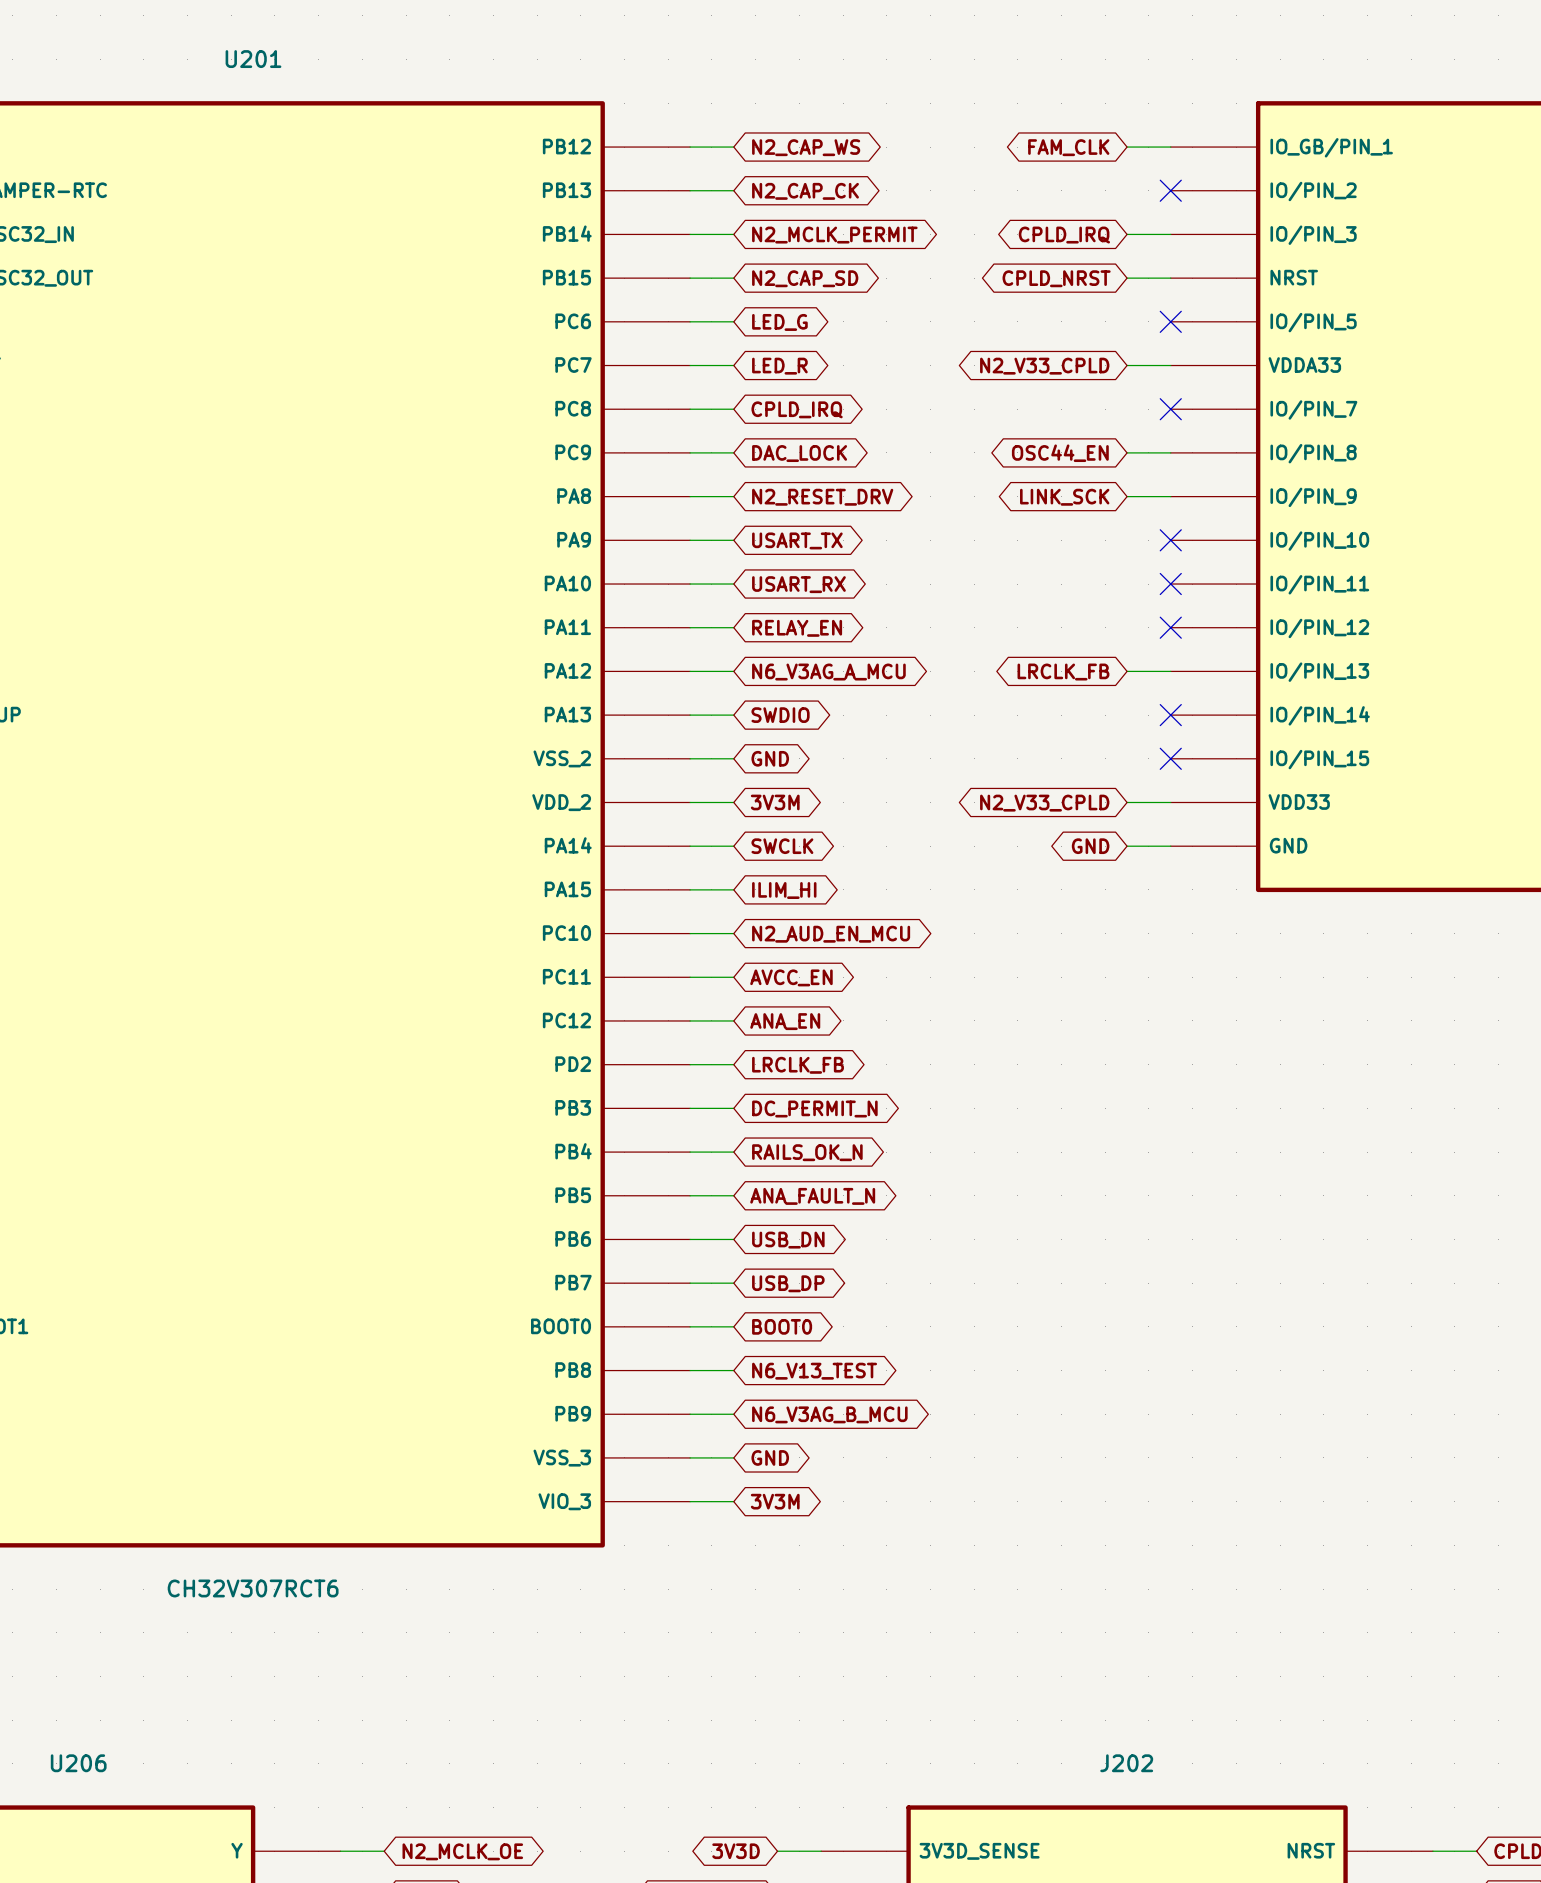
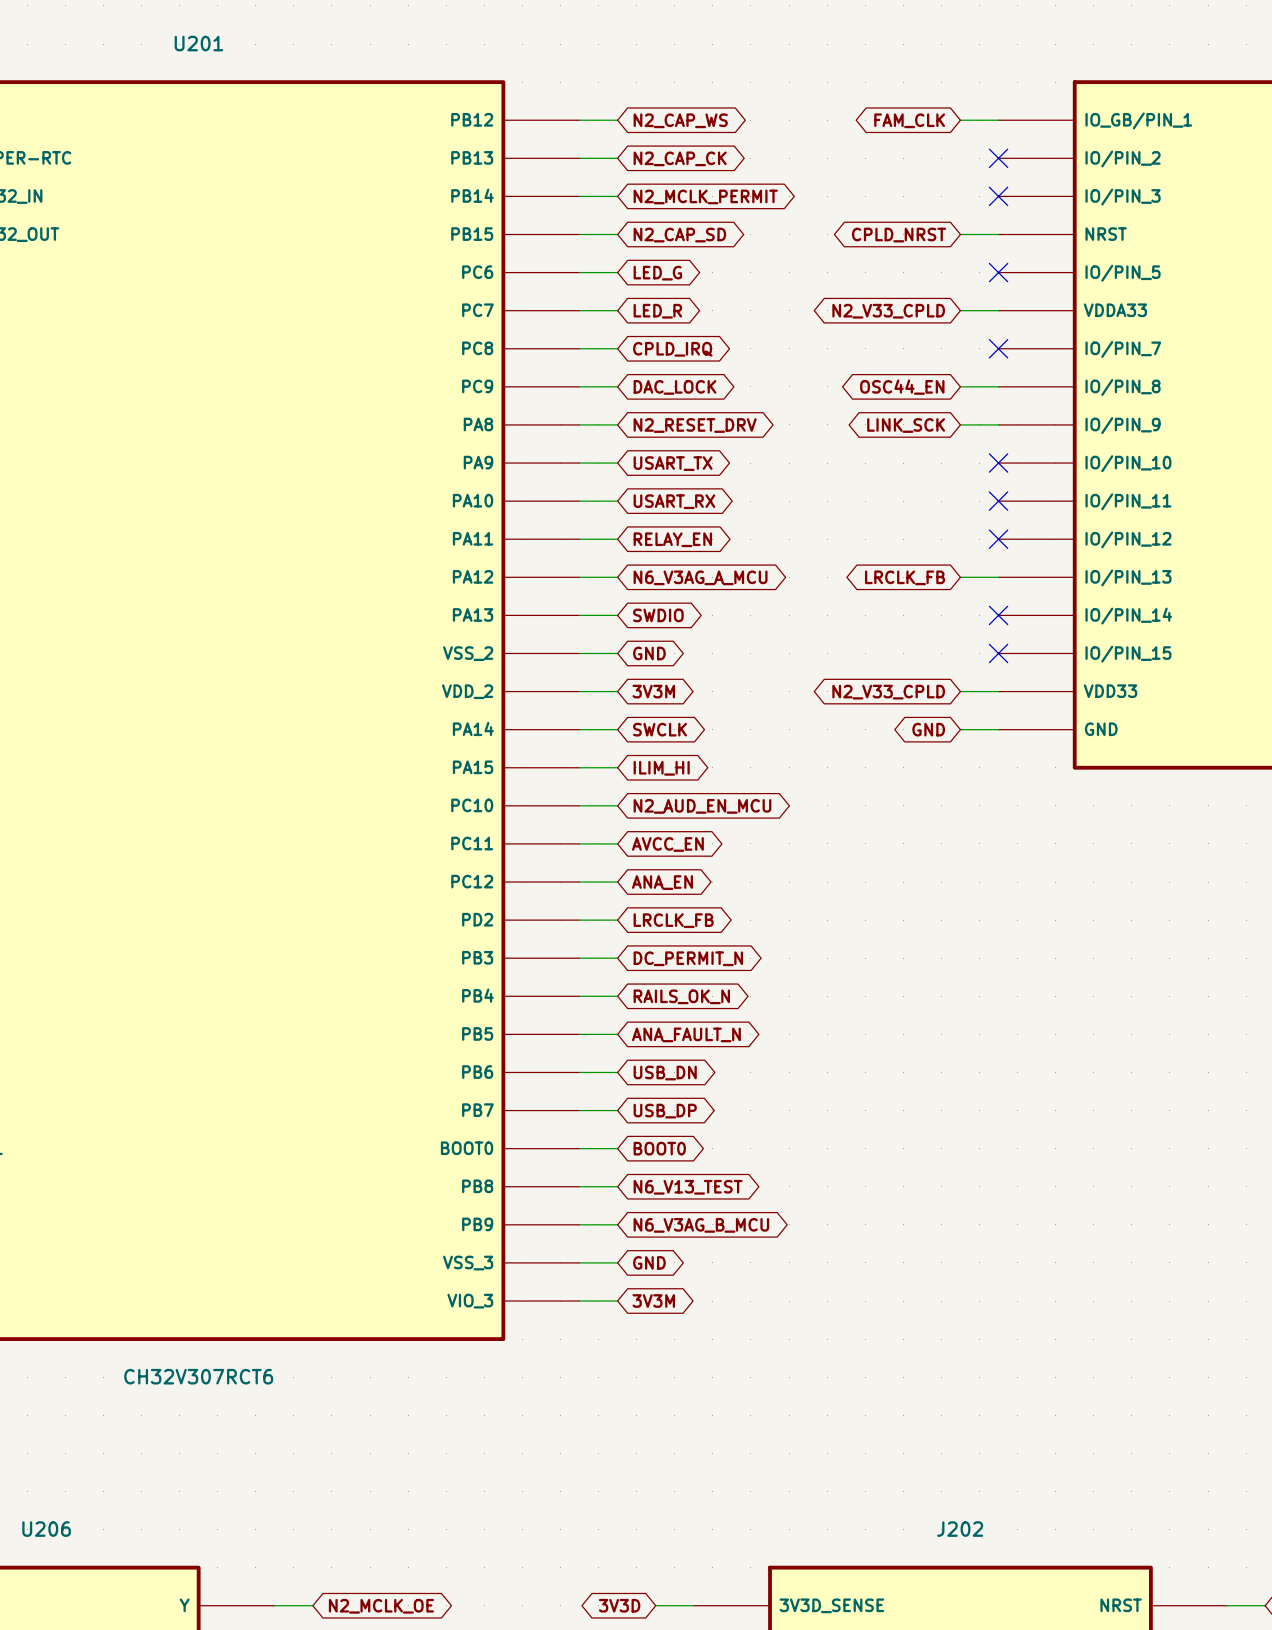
wire: (1127, 234) (1170, 234) -> none
no-connect mark: none -> (998, 196)
global label: CPLD_IRQ (1064, 235) -> none

